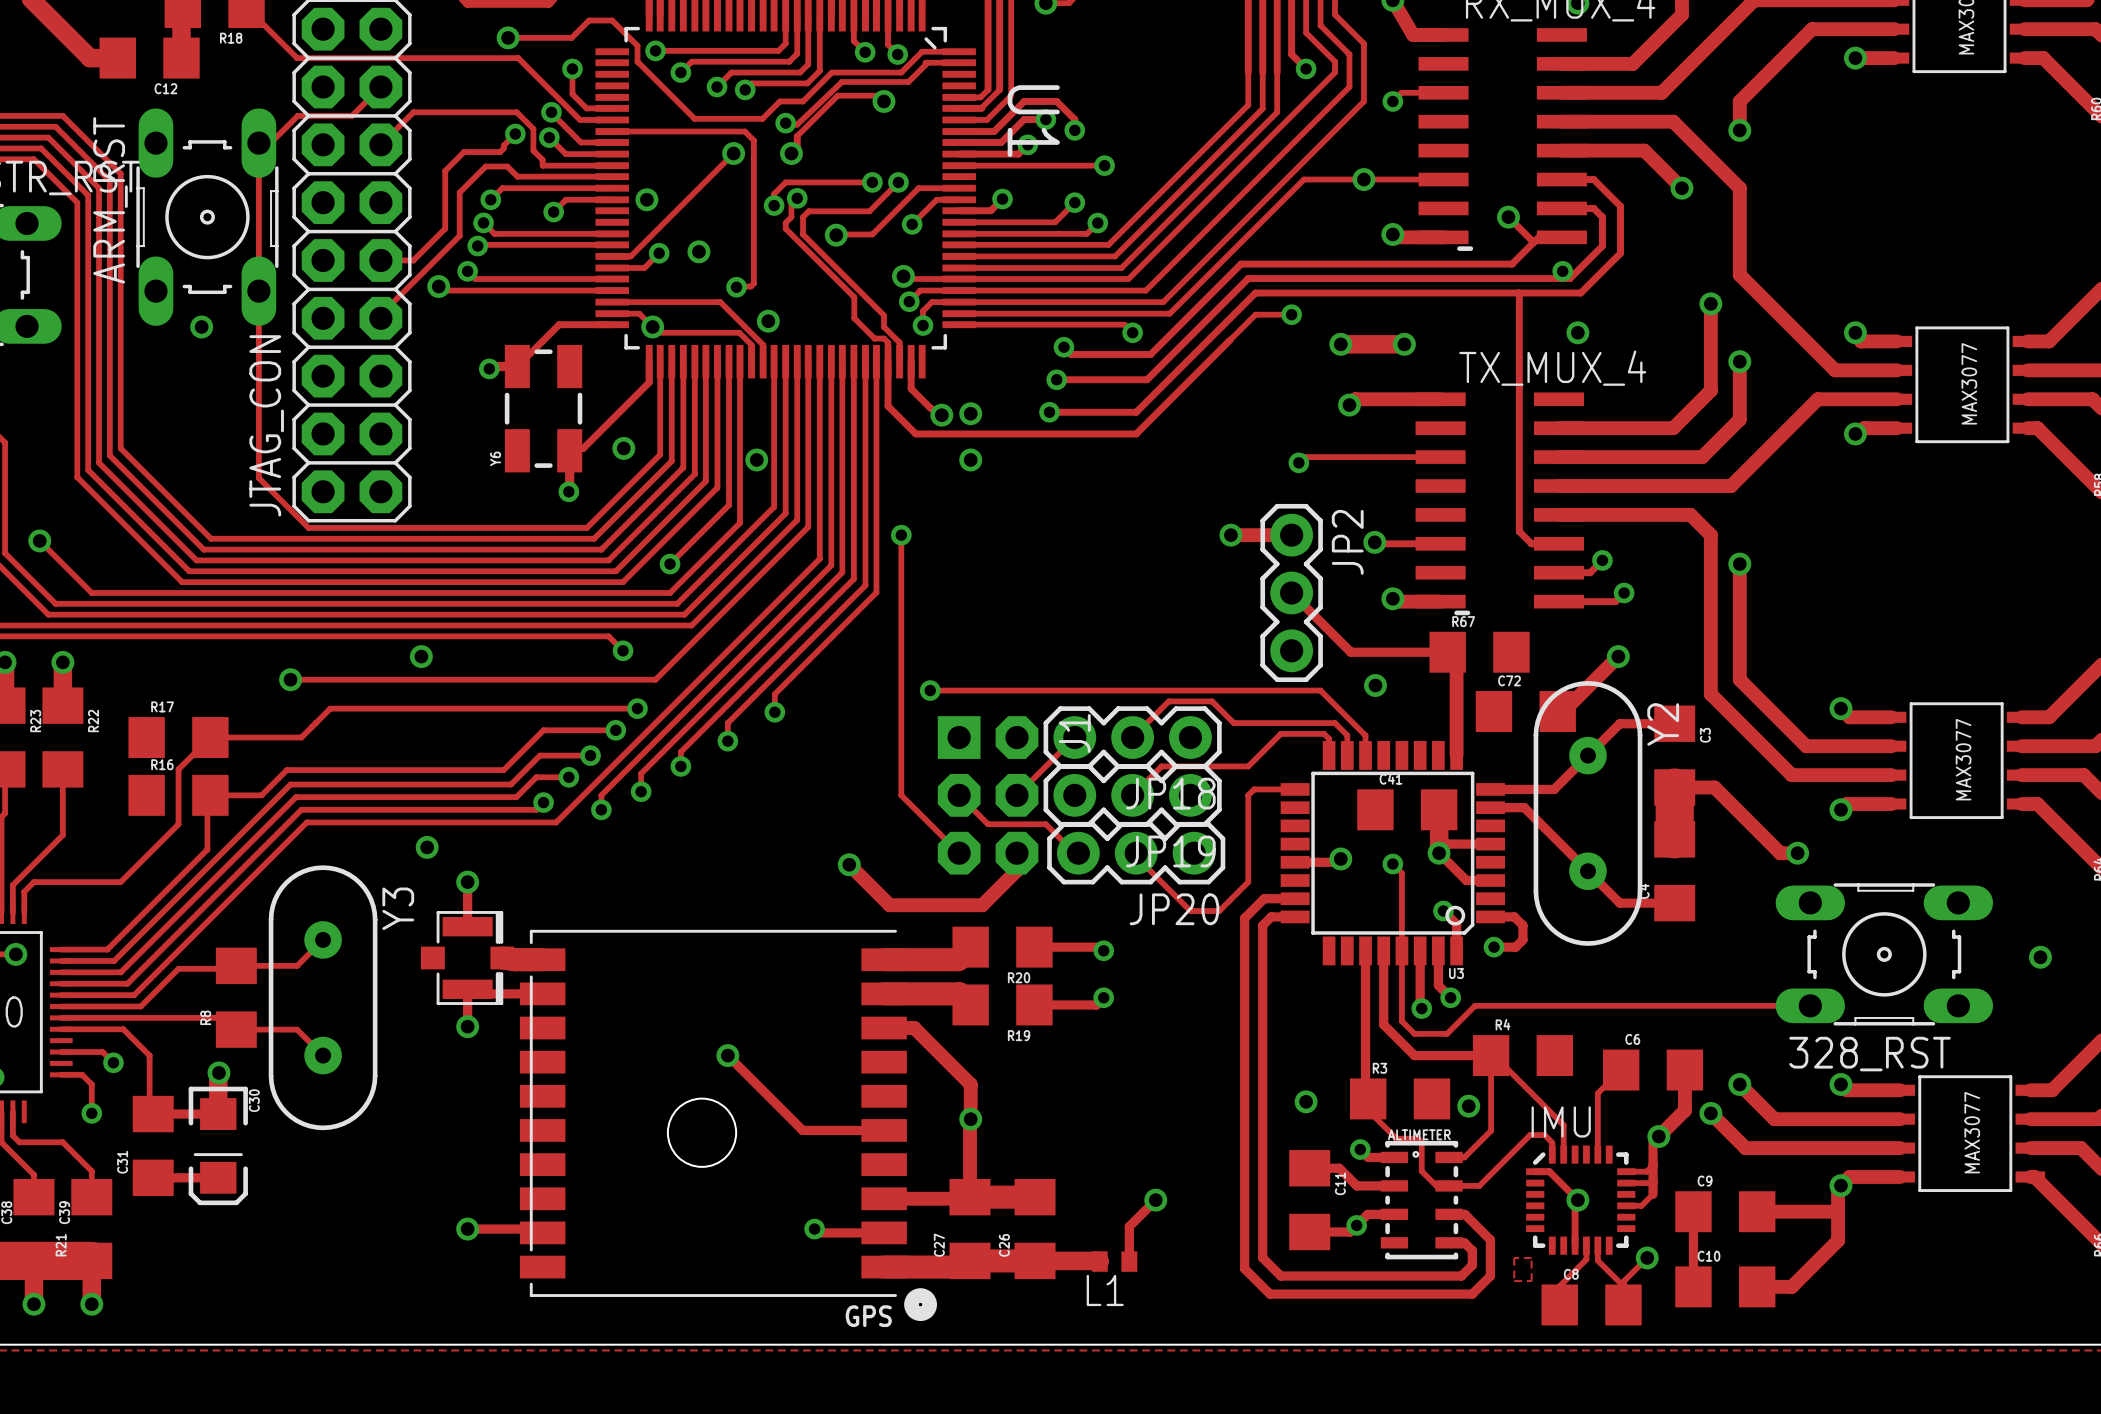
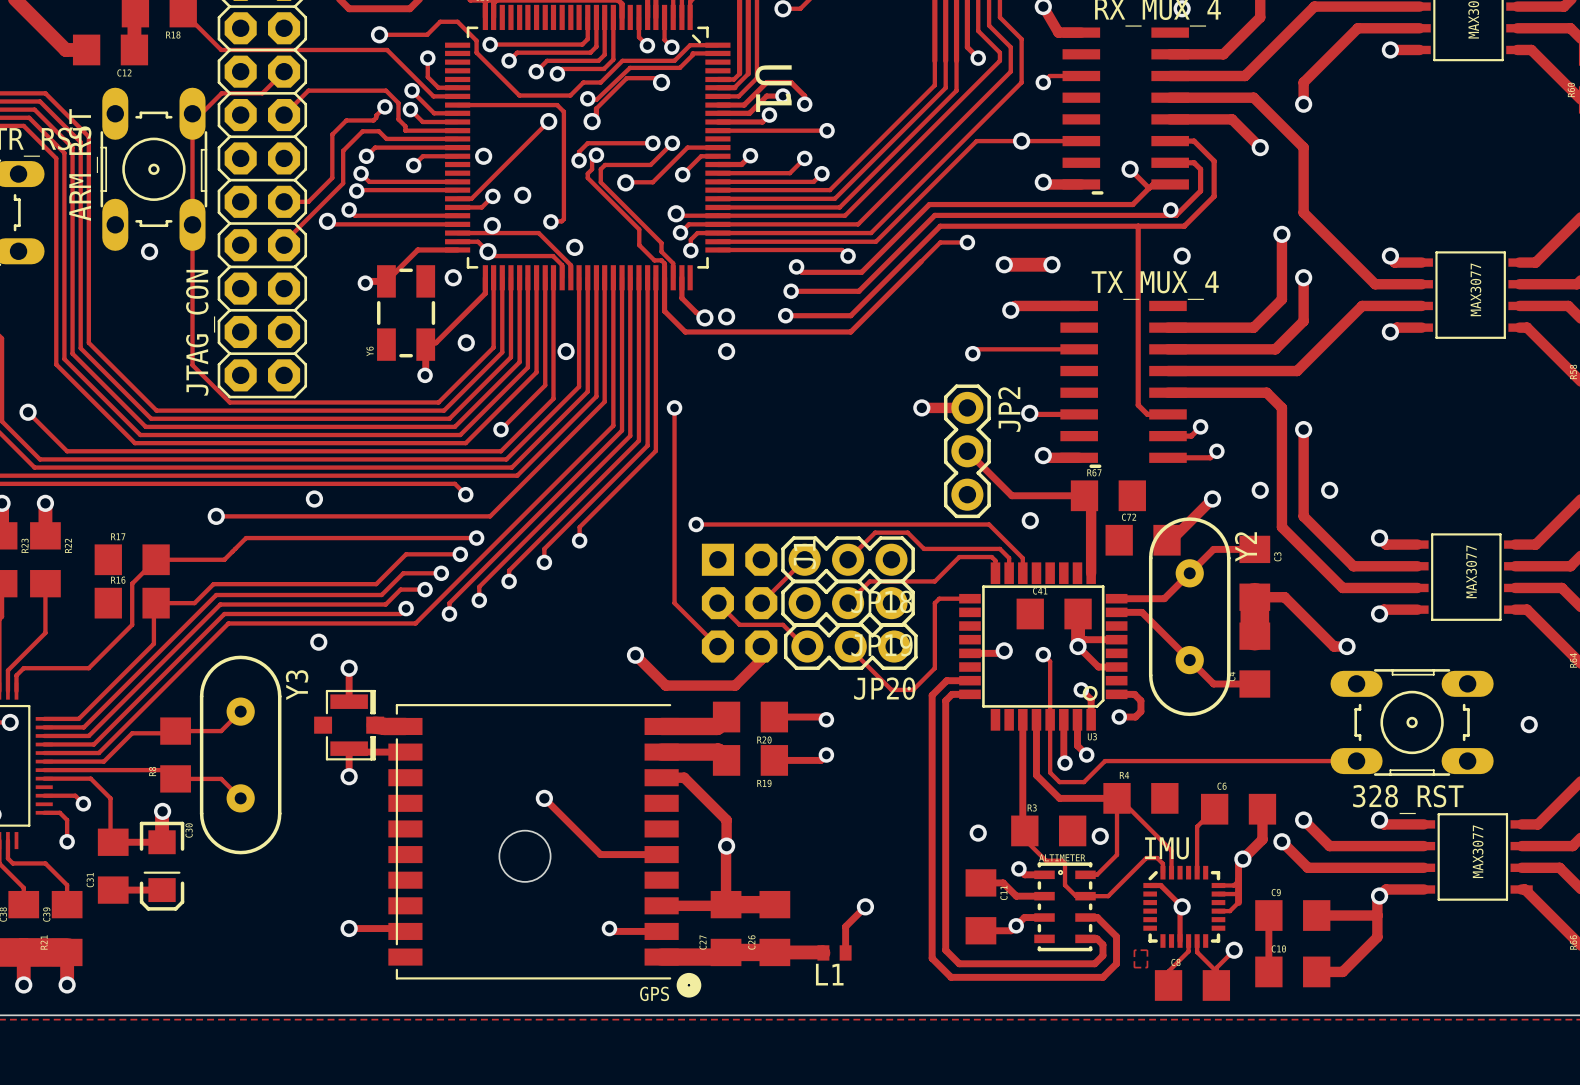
via: none -> (492, 225)
via: none -> (453, 277)
via: none -> (1260, 490)
via: none -> (1329, 490)

